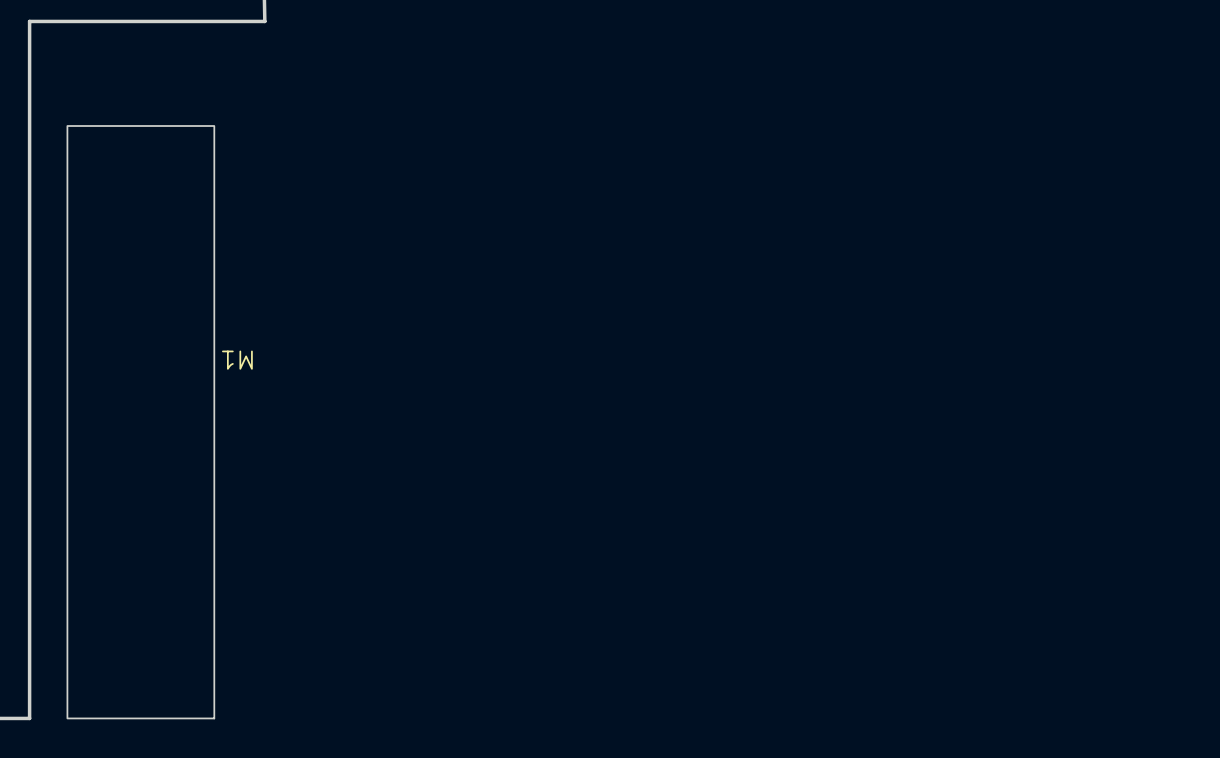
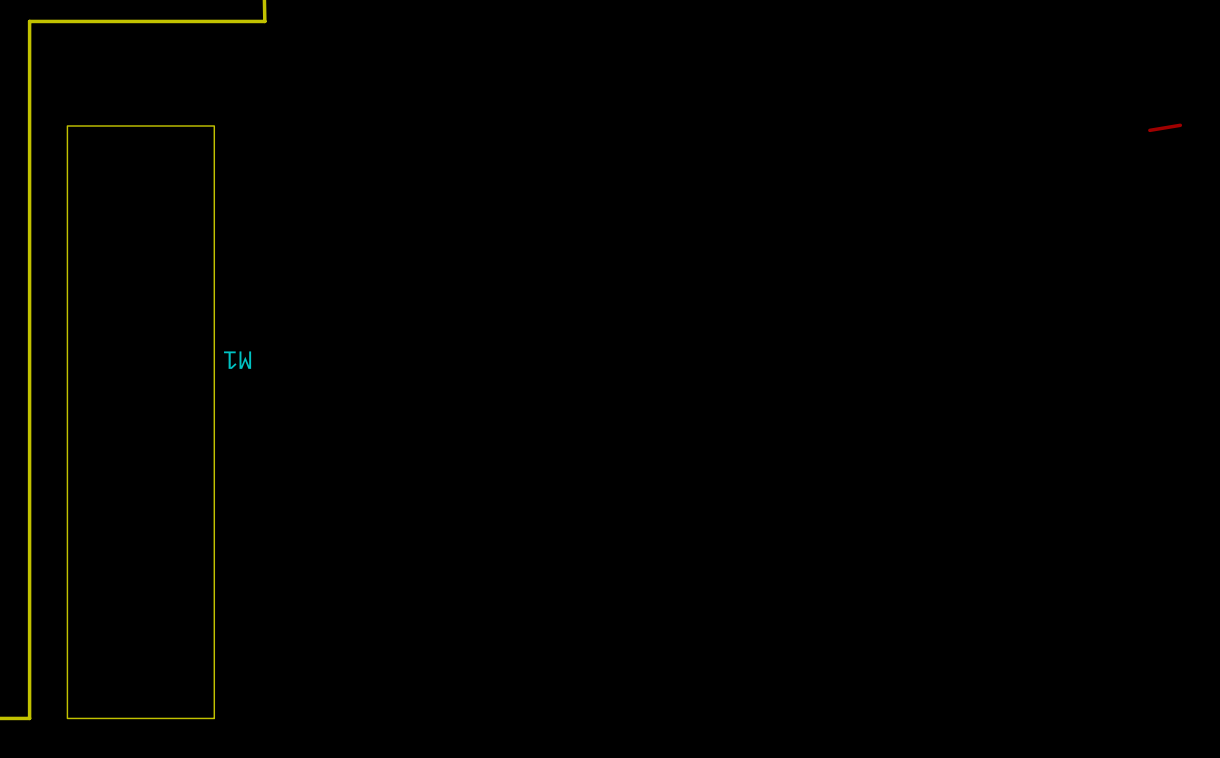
top track: none -> (1180, 125) (1149, 130)

